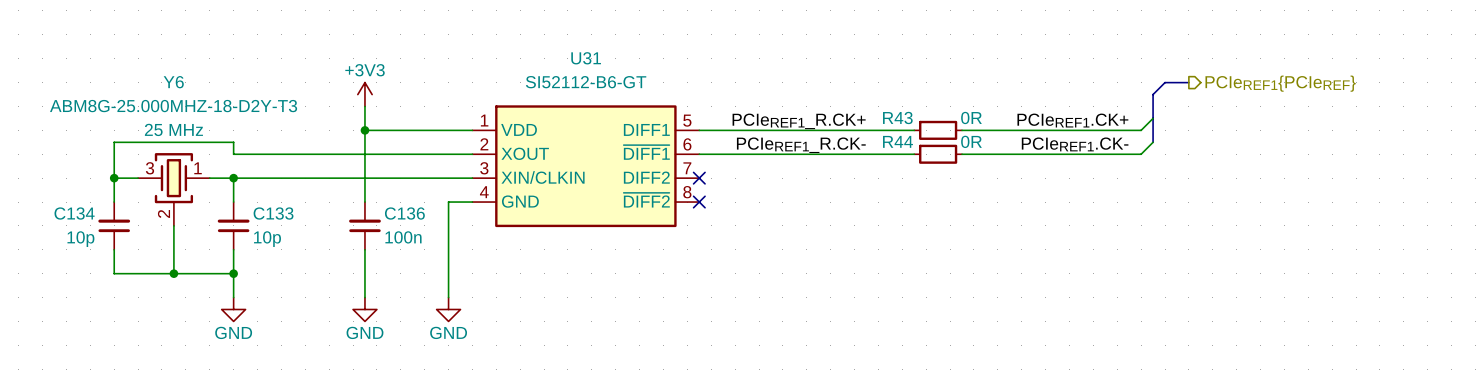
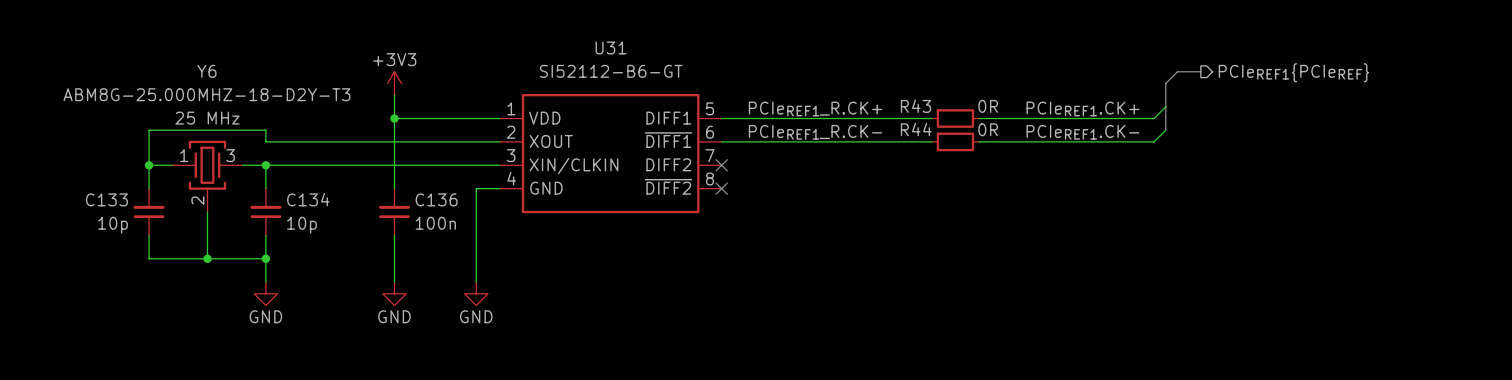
Y6 flip: as is (173, 178) -> left-right (207, 165)
C134 name: C134 (74, 213) -> C133 (106, 199)
C133 name: C133 (273, 213) -> C134 (308, 199)

